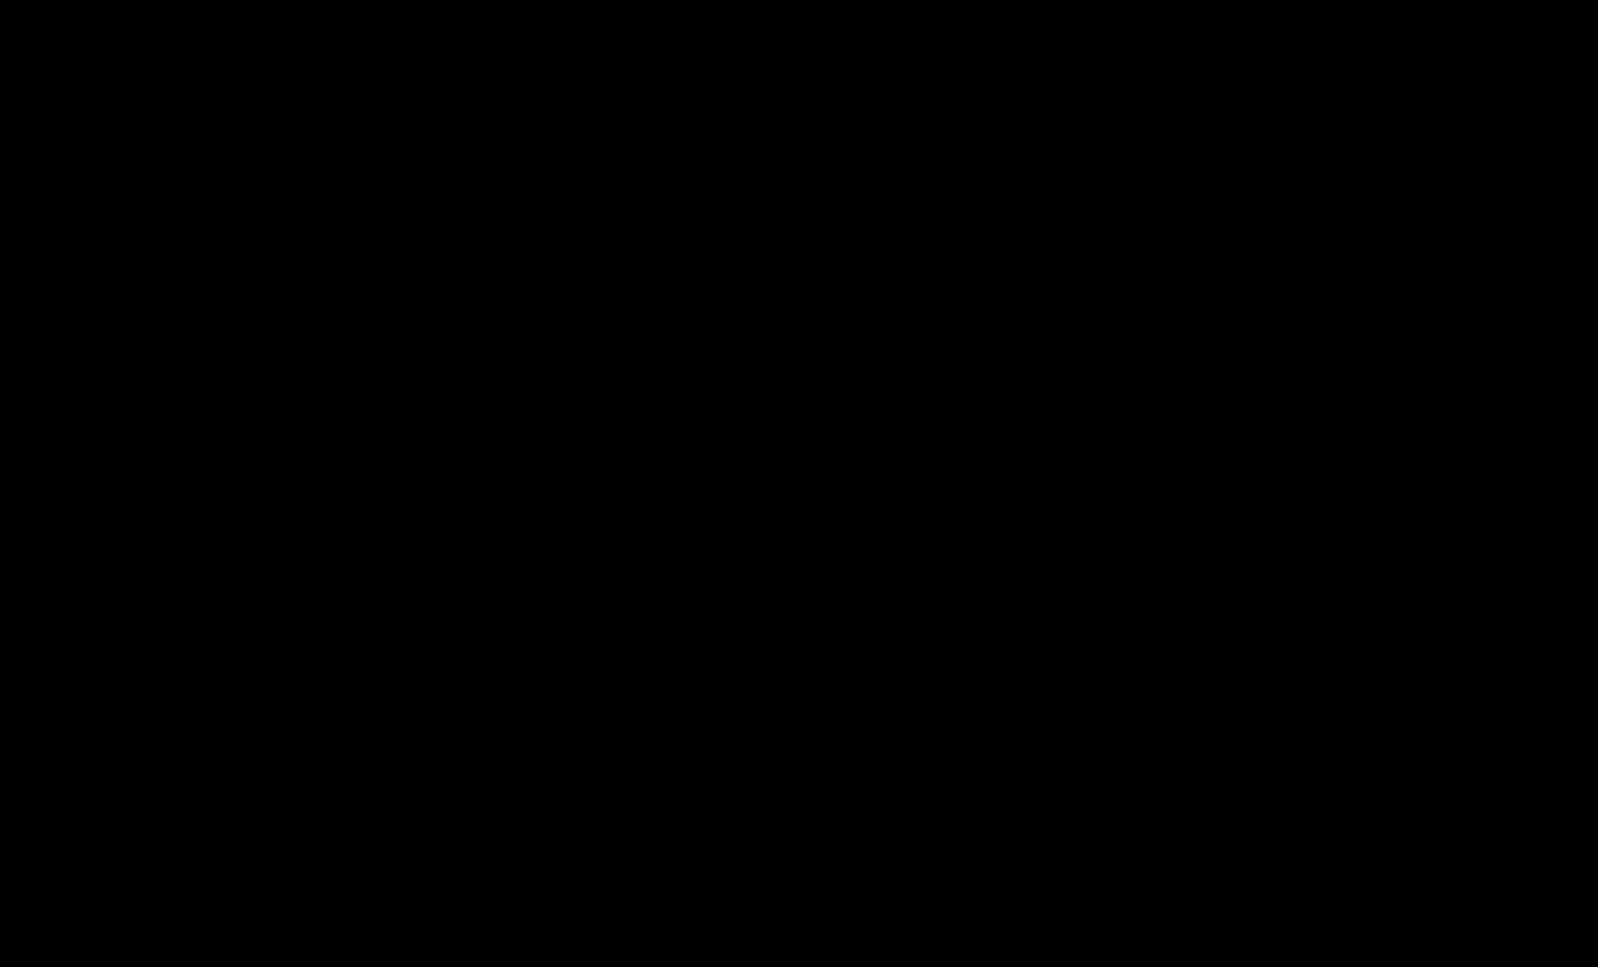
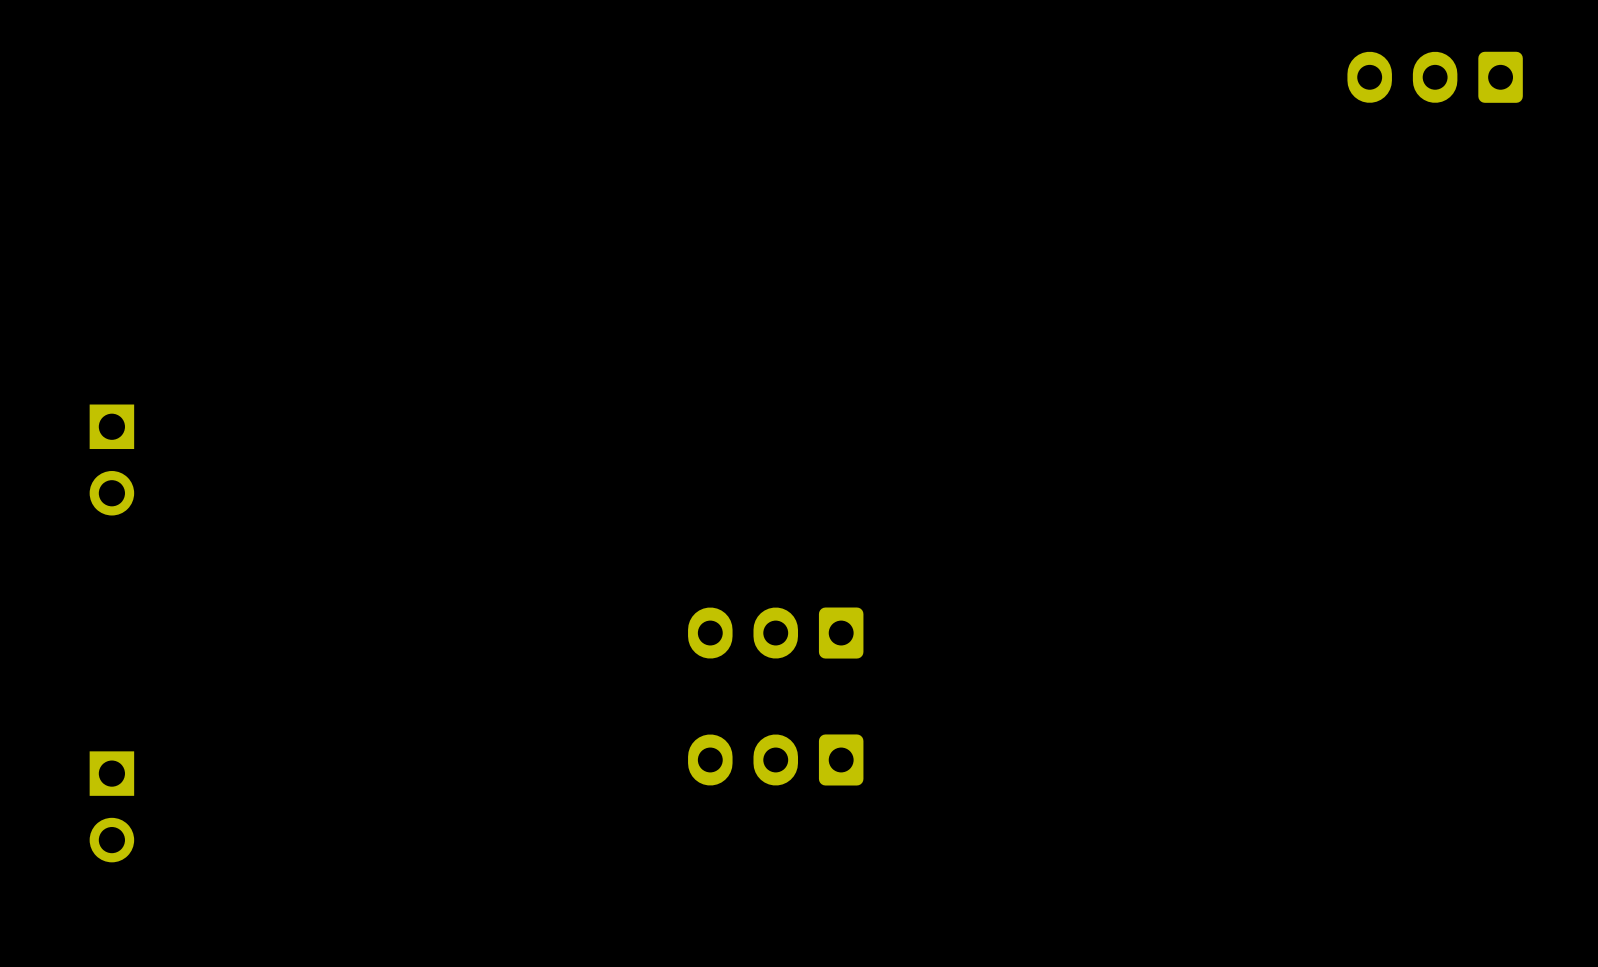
part: none -> (1435, 77)
part: none -> (111, 460)
part: none -> (775, 633)
part: none -> (775, 759)
part: none -> (111, 806)

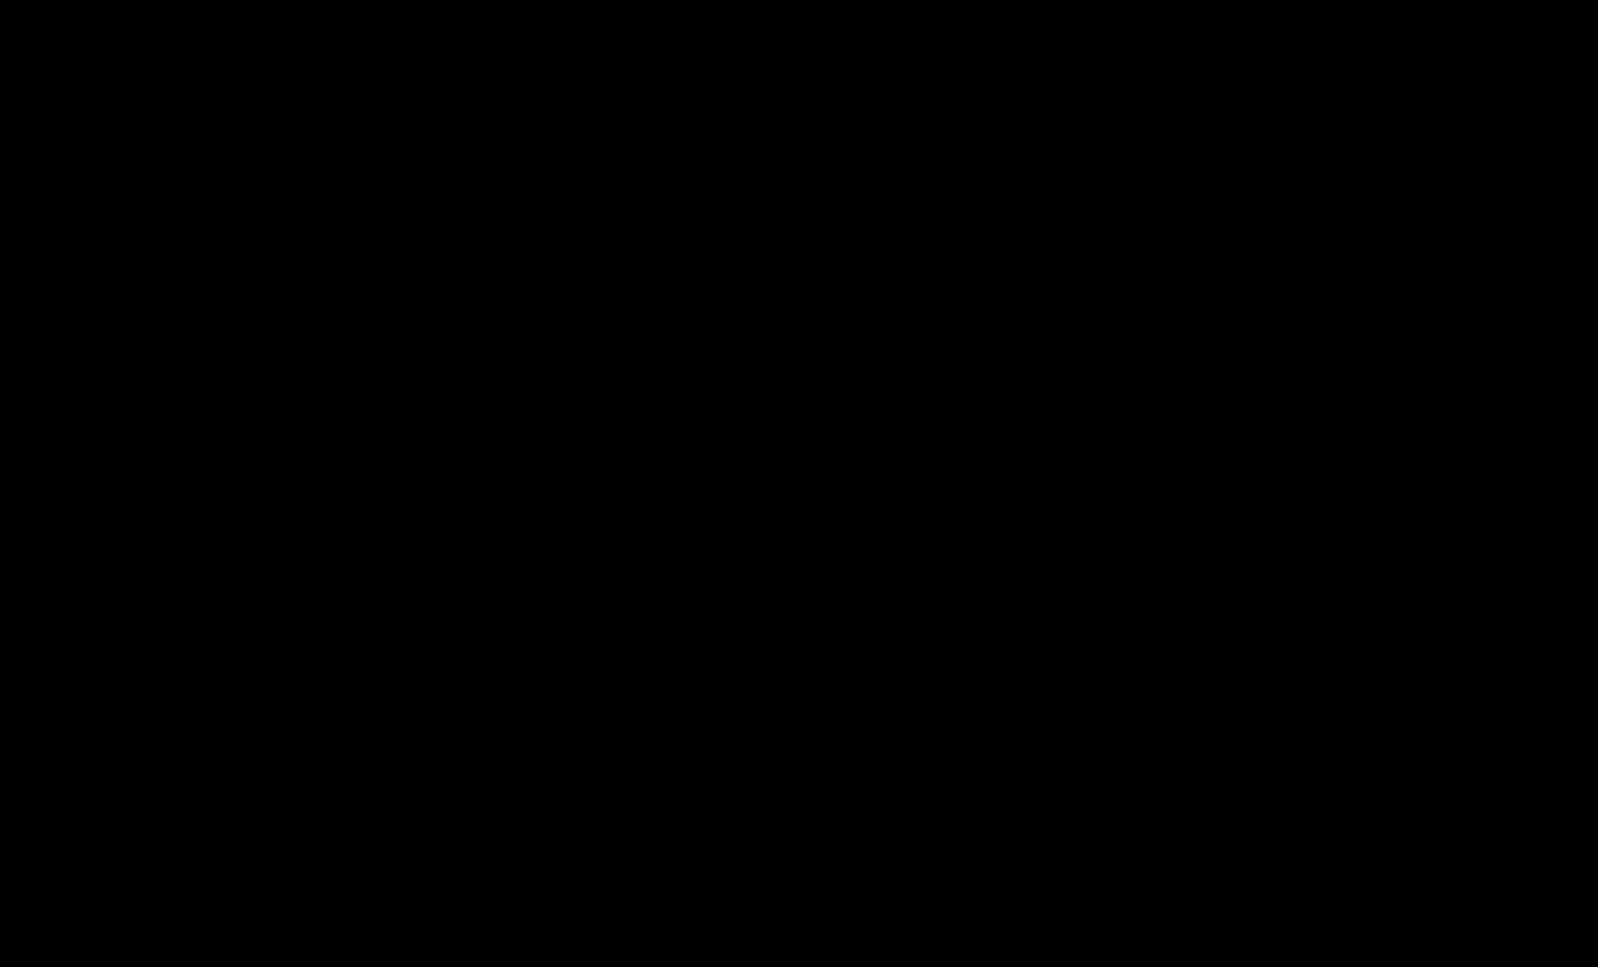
part: (1435, 77) -> none
part: (111, 460) -> none
part: (775, 633) -> none
part: (775, 759) -> none
part: (111, 806) -> none

